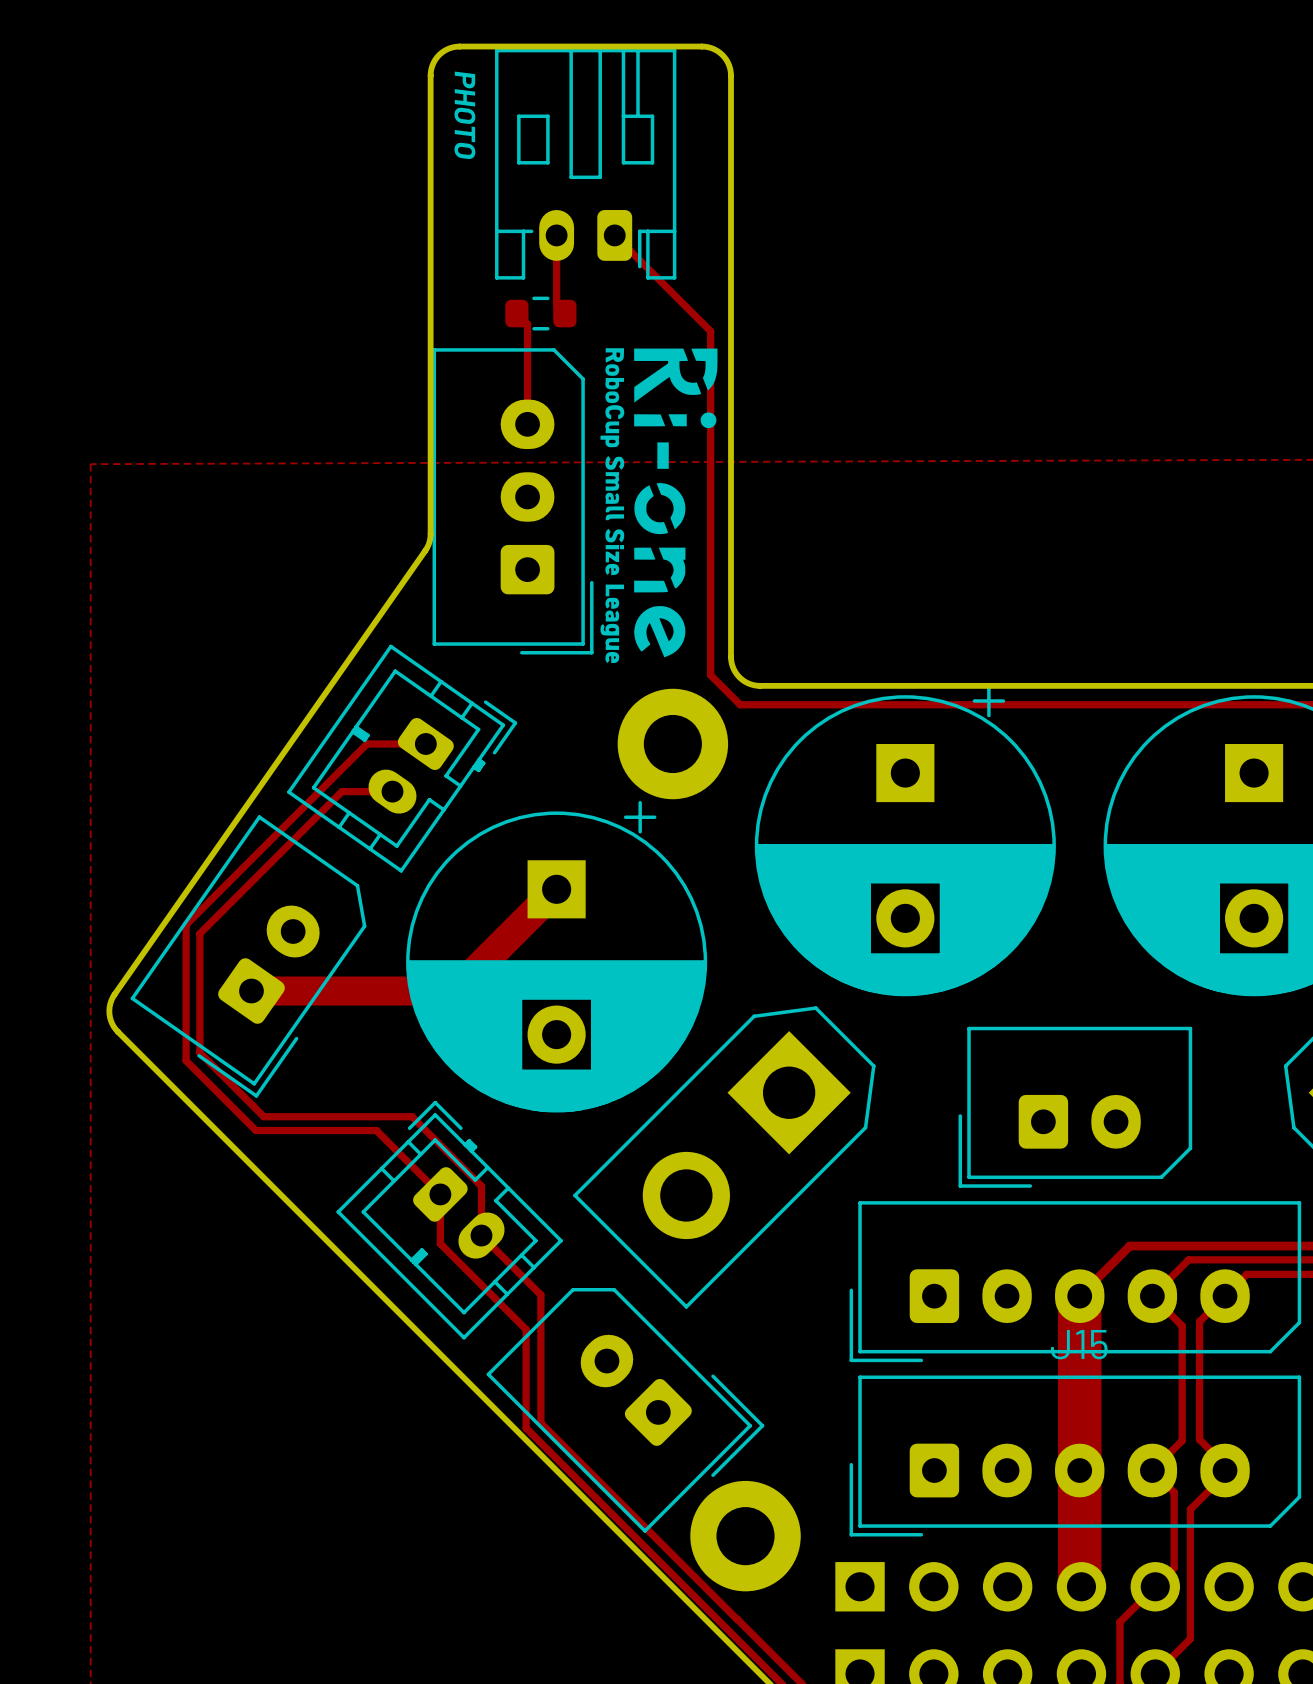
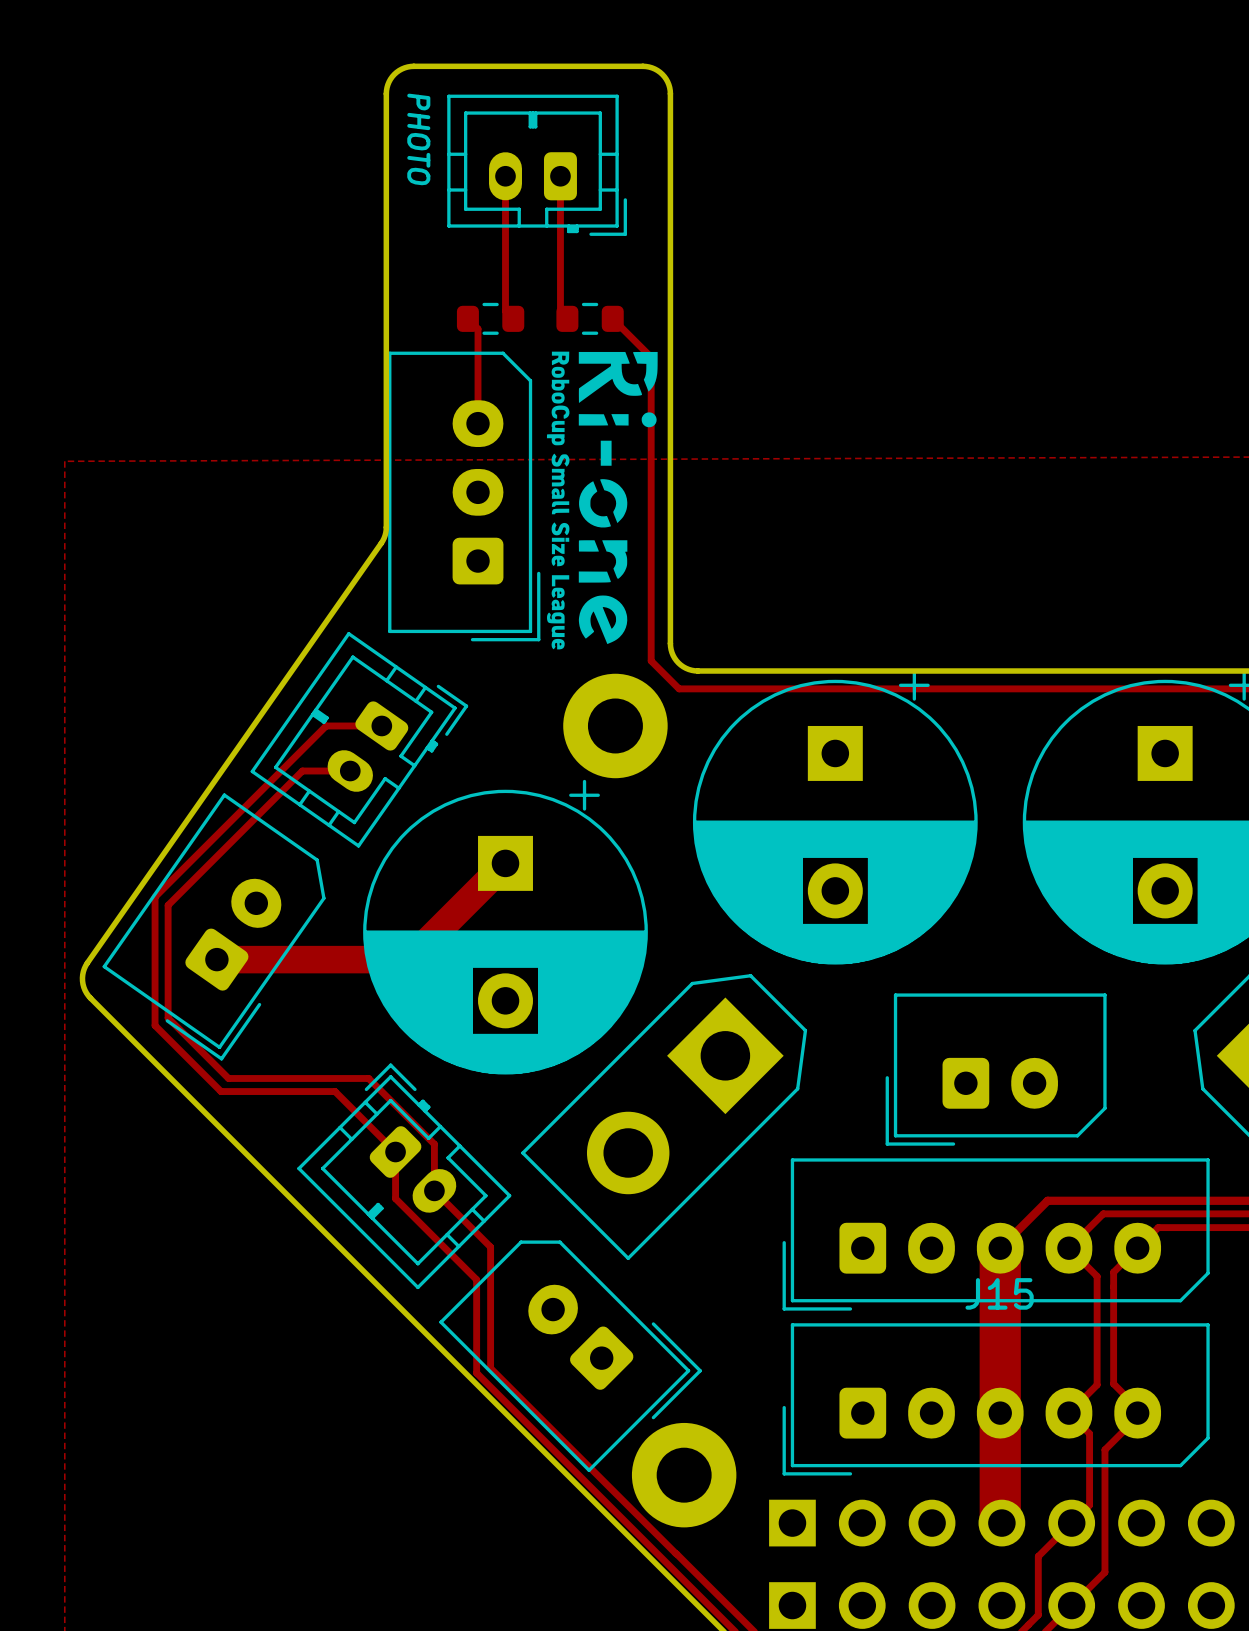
part footprint: [495, 48, 677, 280] -> [447, 94, 627, 236]
track: none -> (505, 176) (505, 244)
track: none -> (560, 176) (560, 311) (567, 318)
track: (617, 232) (614, 235) (710, 331) (710, 354) -> (612, 318) (651, 357)
part: none -> (590, 318)

